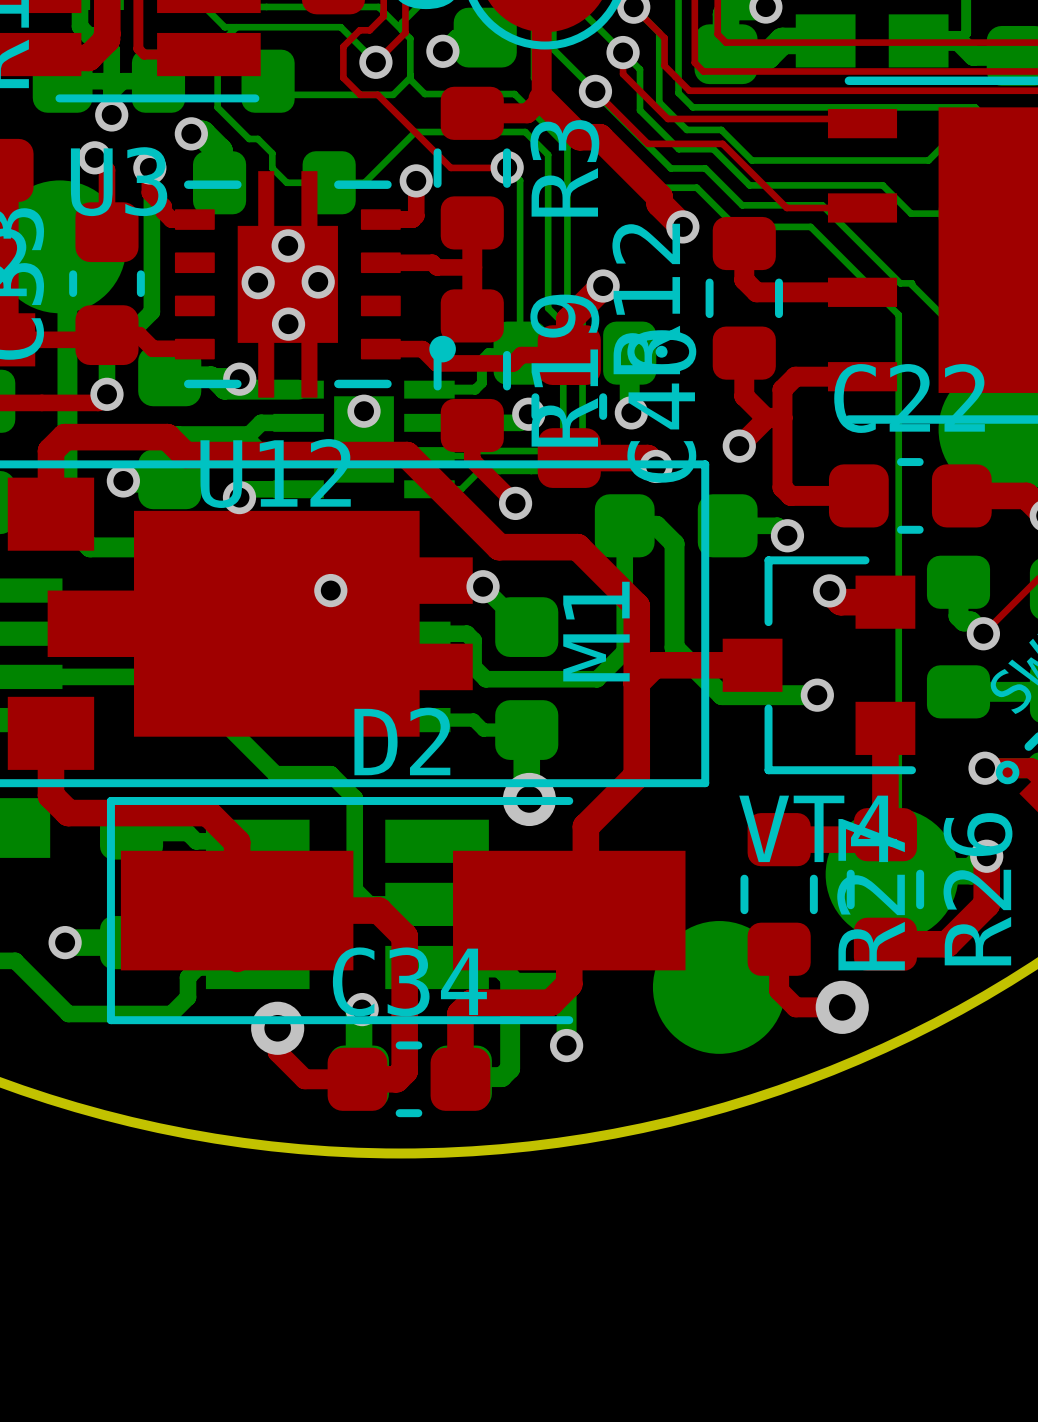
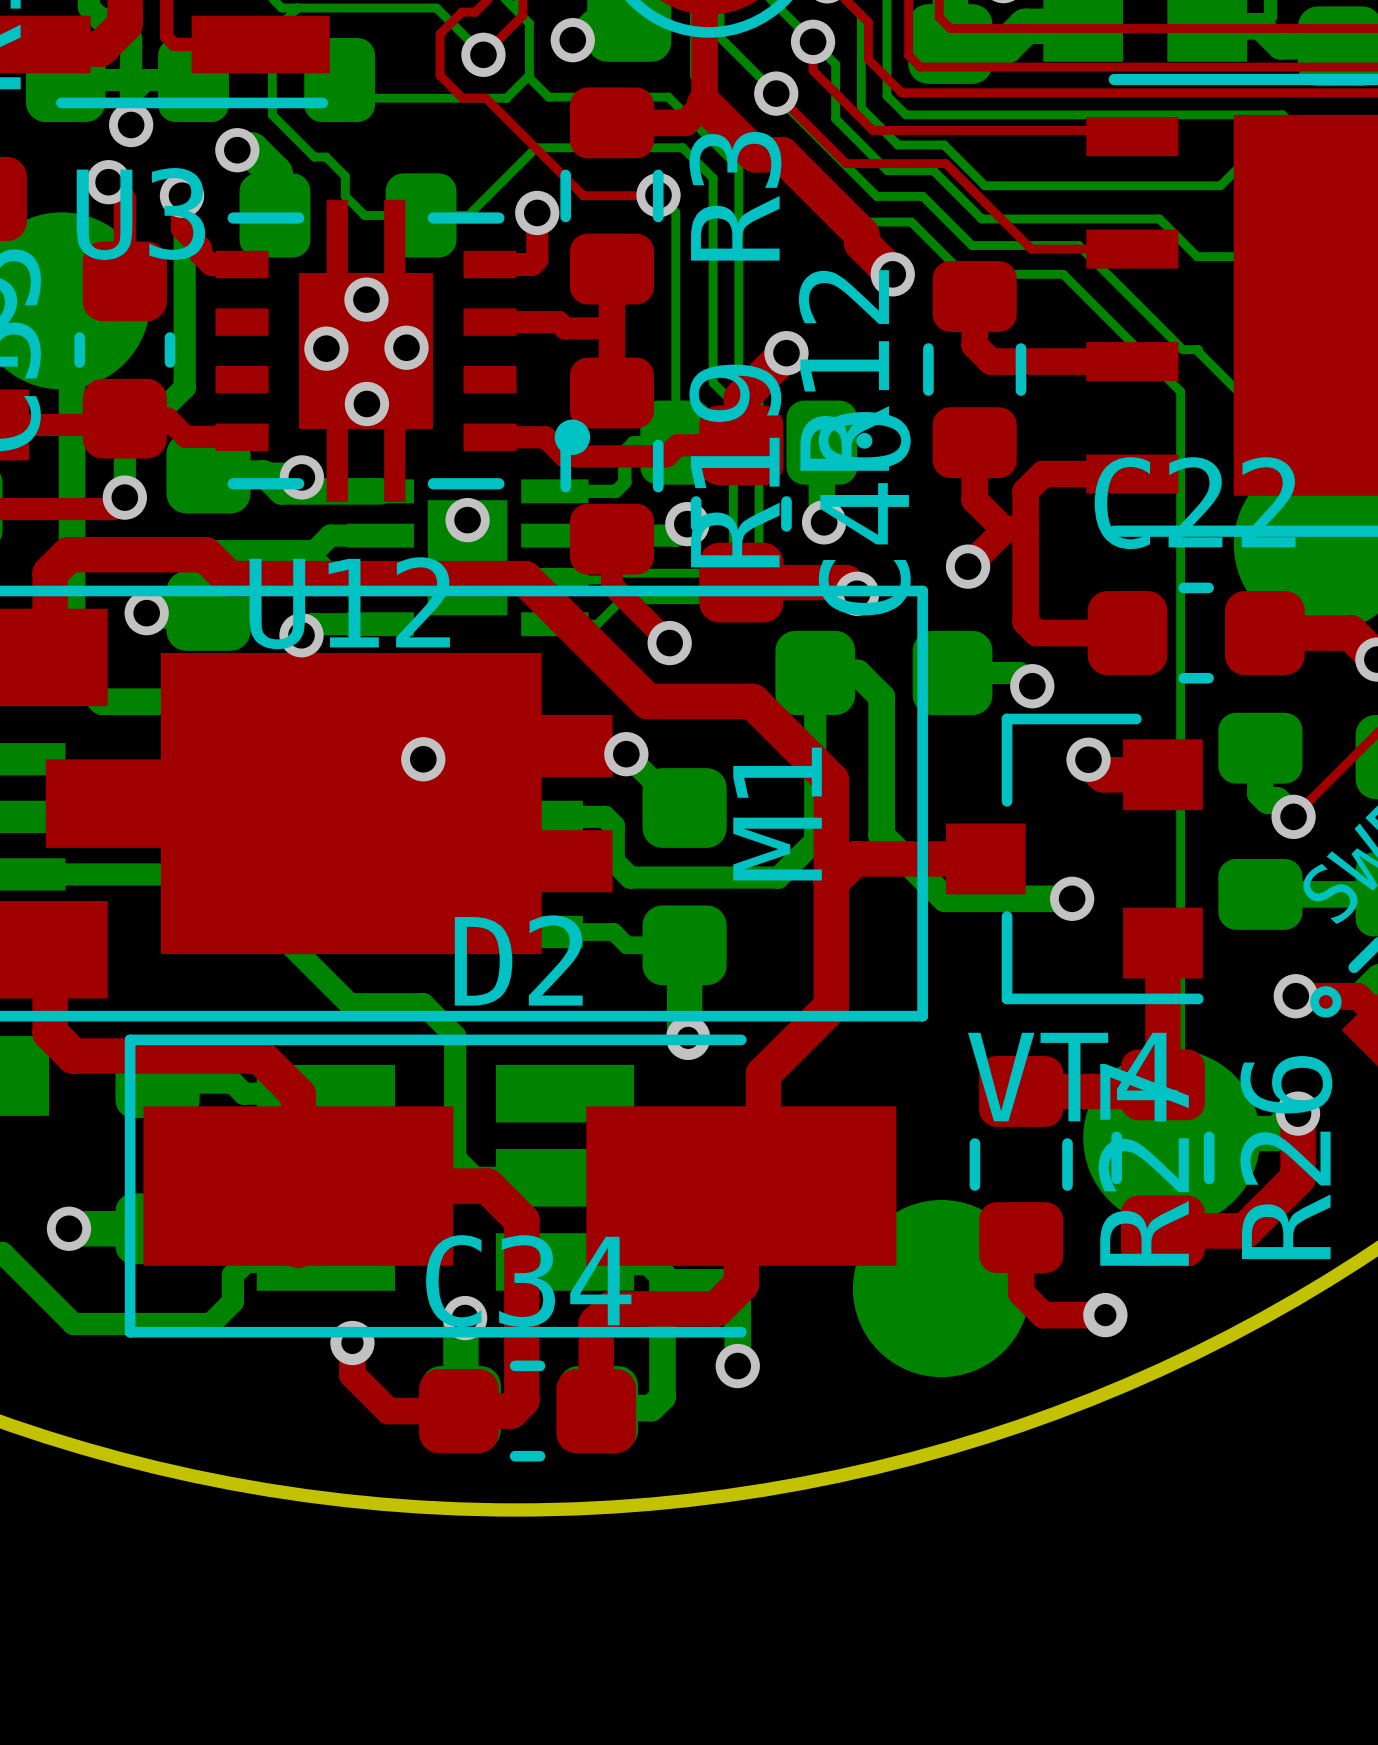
via size: [502, 772, 556, 827] -> [666, 1015, 711, 1061]
via size: [815, 980, 869, 1034] -> [1083, 1292, 1128, 1338]
via size: [251, 1001, 305, 1055] -> [330, 1320, 375, 1366]

